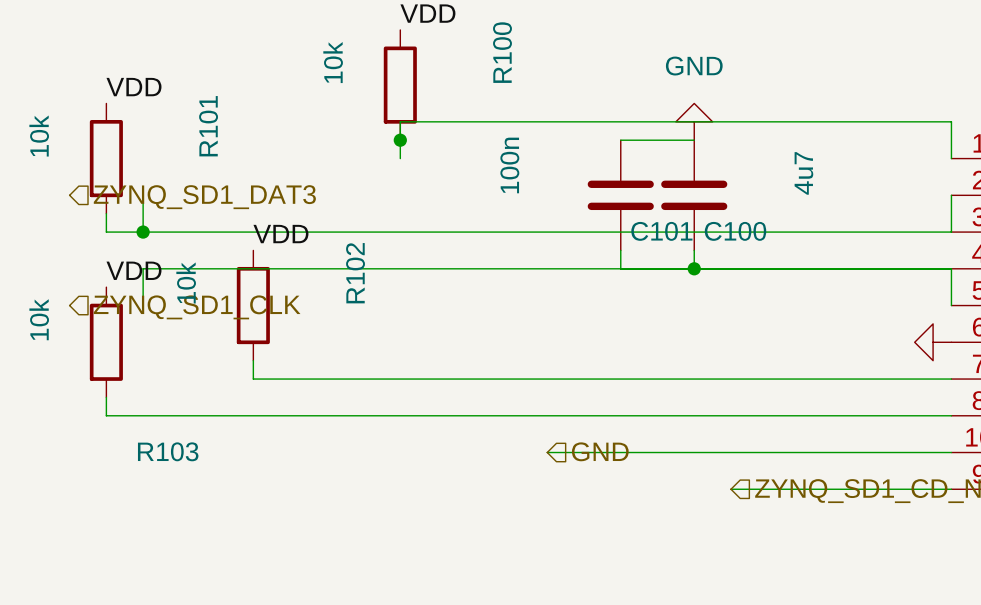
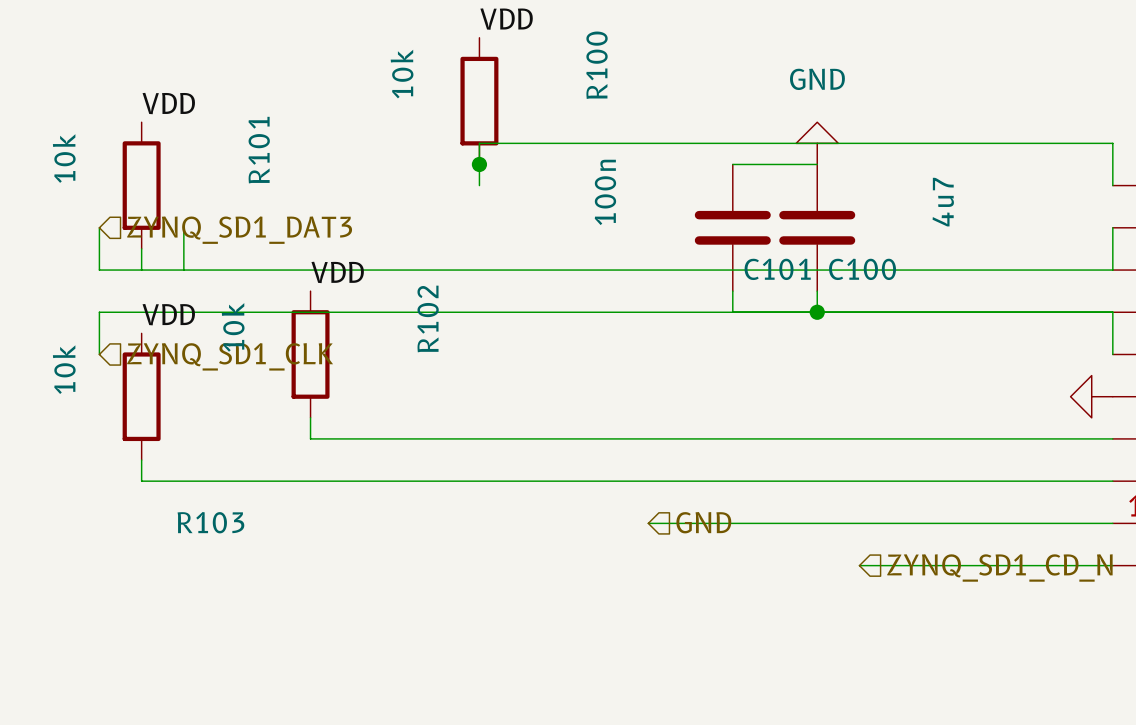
wire: none -> (99, 227) (99, 270) (141, 270)
junction: (143, 232) -> none
wire: (143, 268) (143, 305) -> (183, 312) (99, 312) (99, 354)

